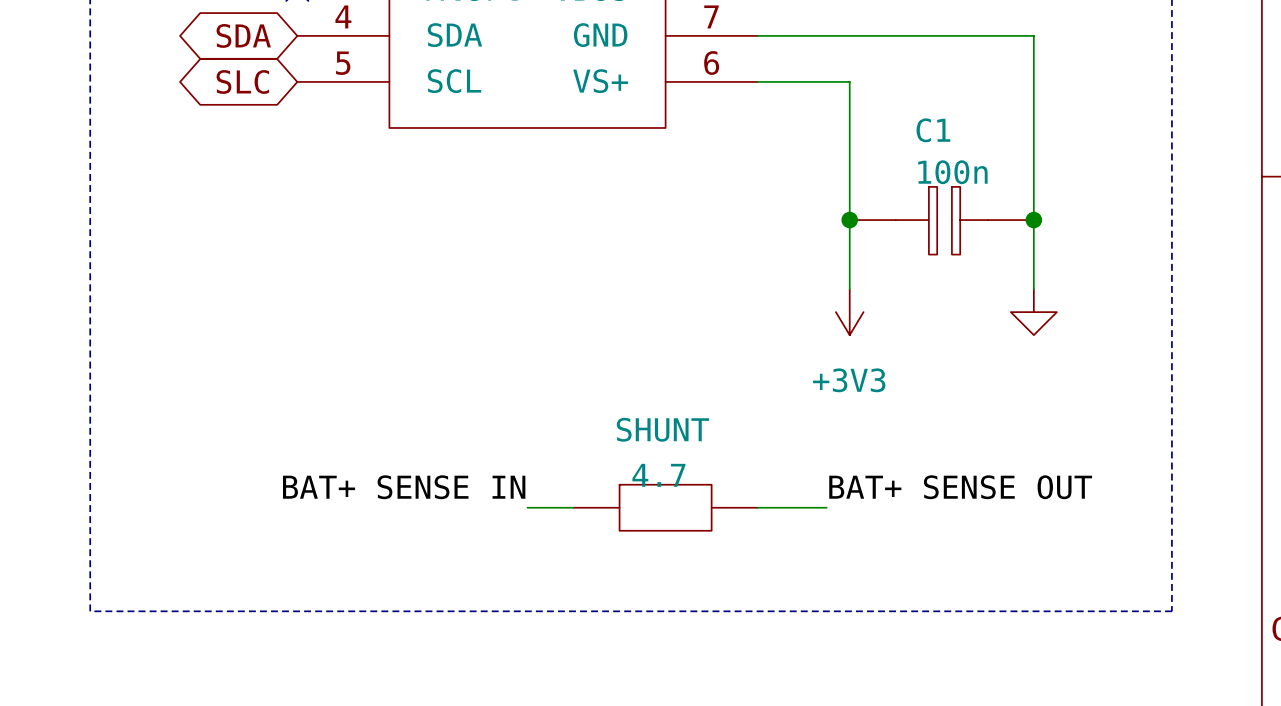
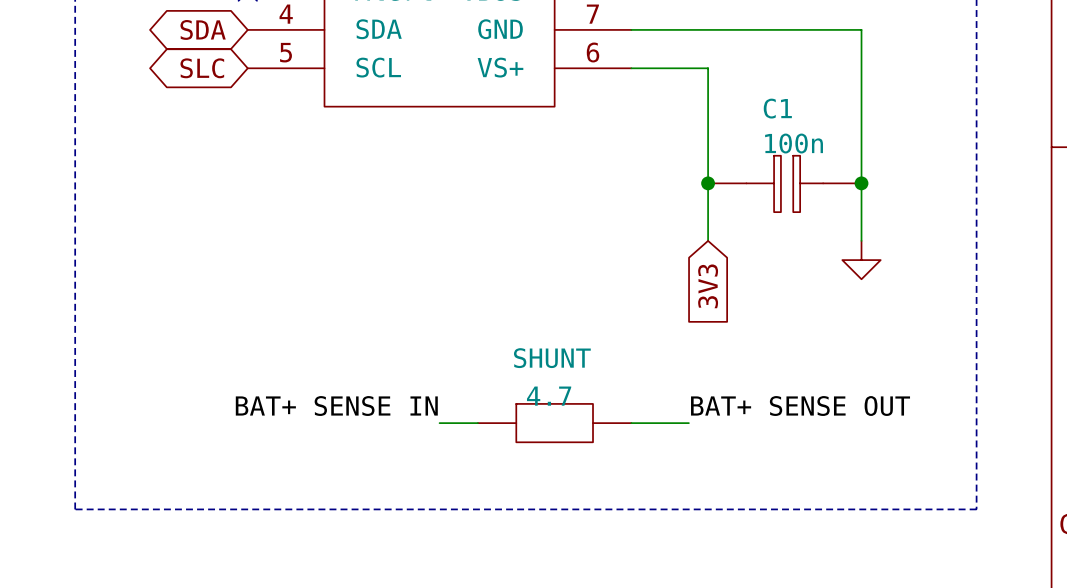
power symbol: +3V3 (849, 312) -> none
global label: none -> 3V3 (708, 286)

